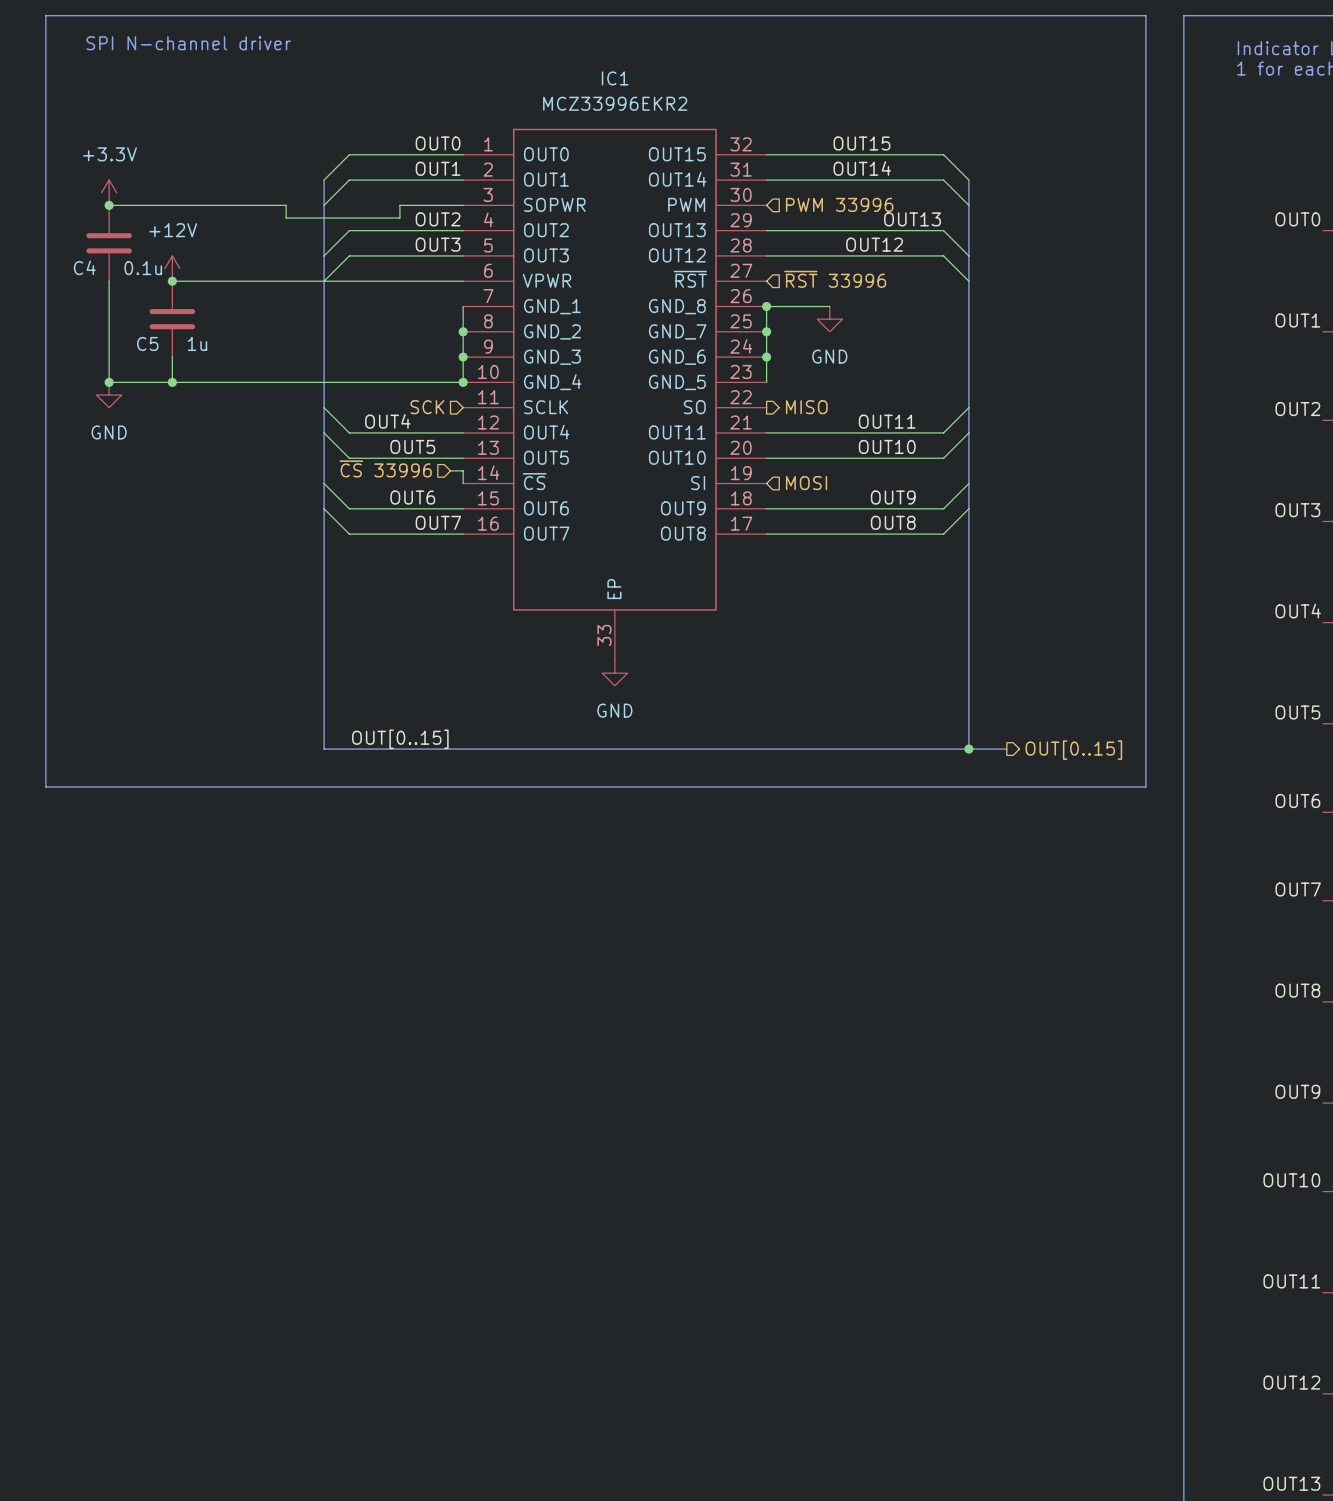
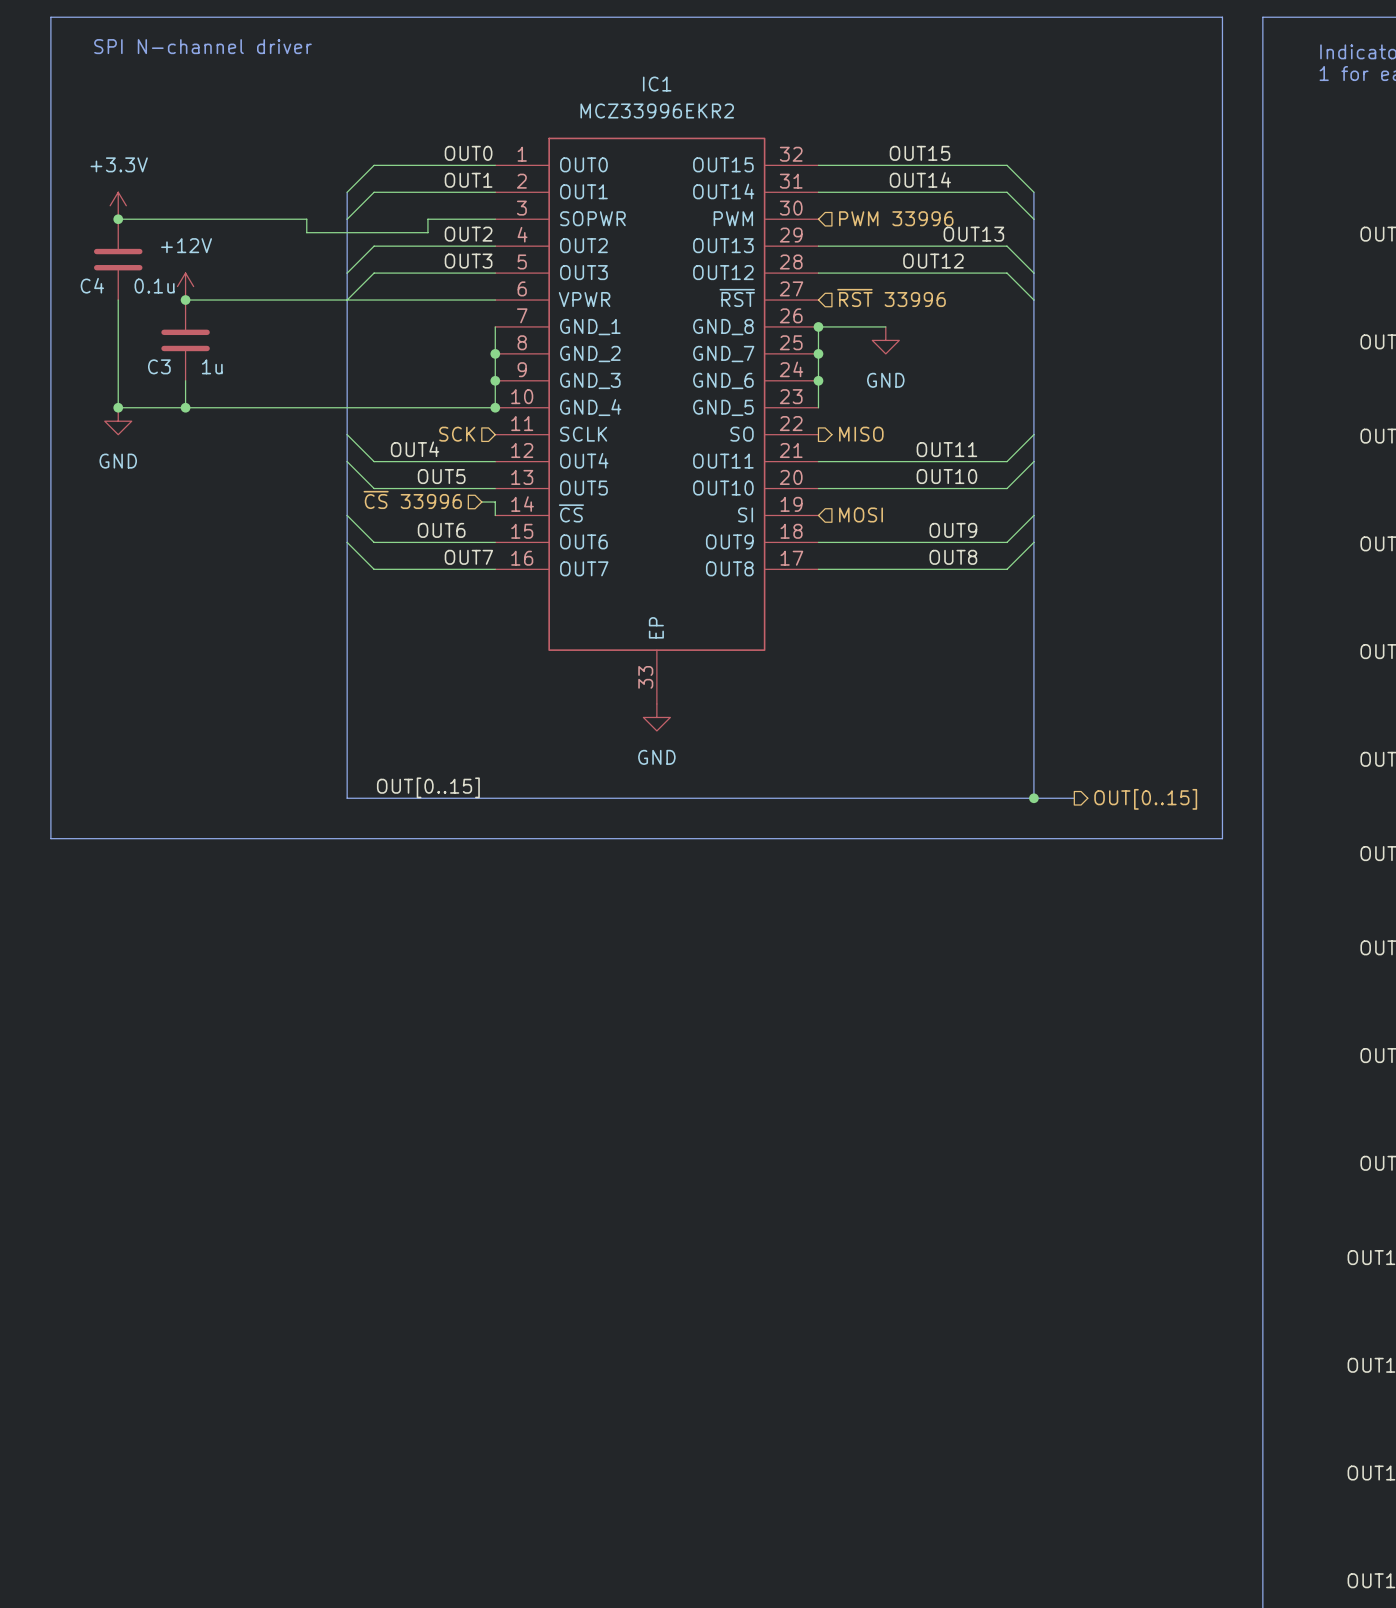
C5 name: C5 (147, 343) -> C3 (159, 366)

